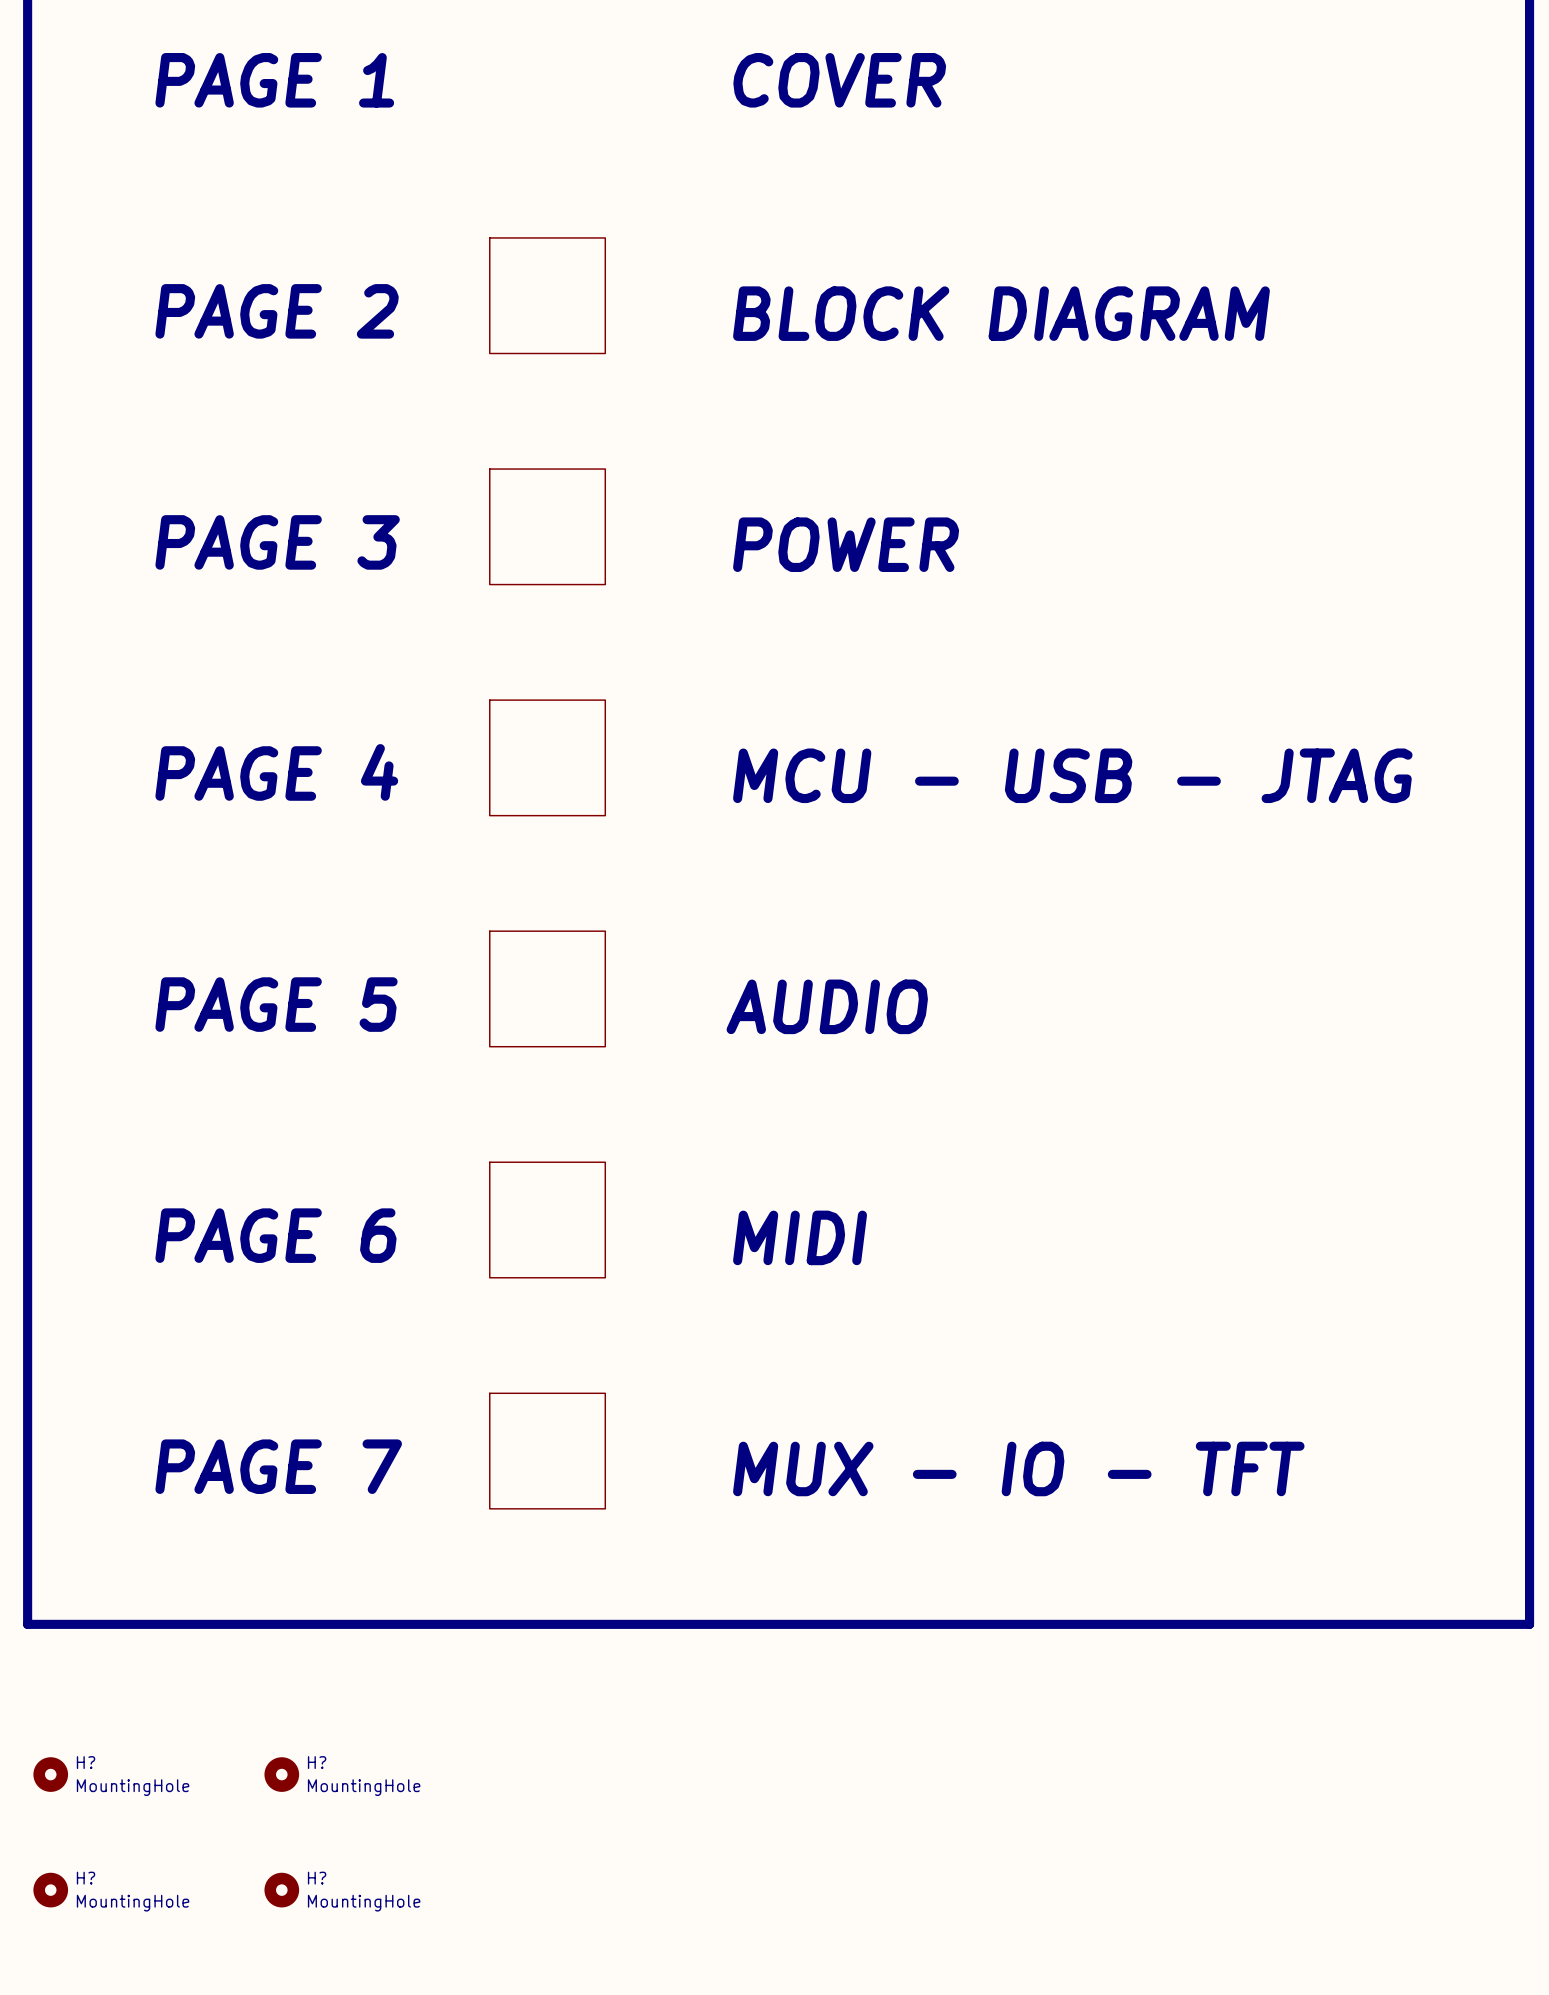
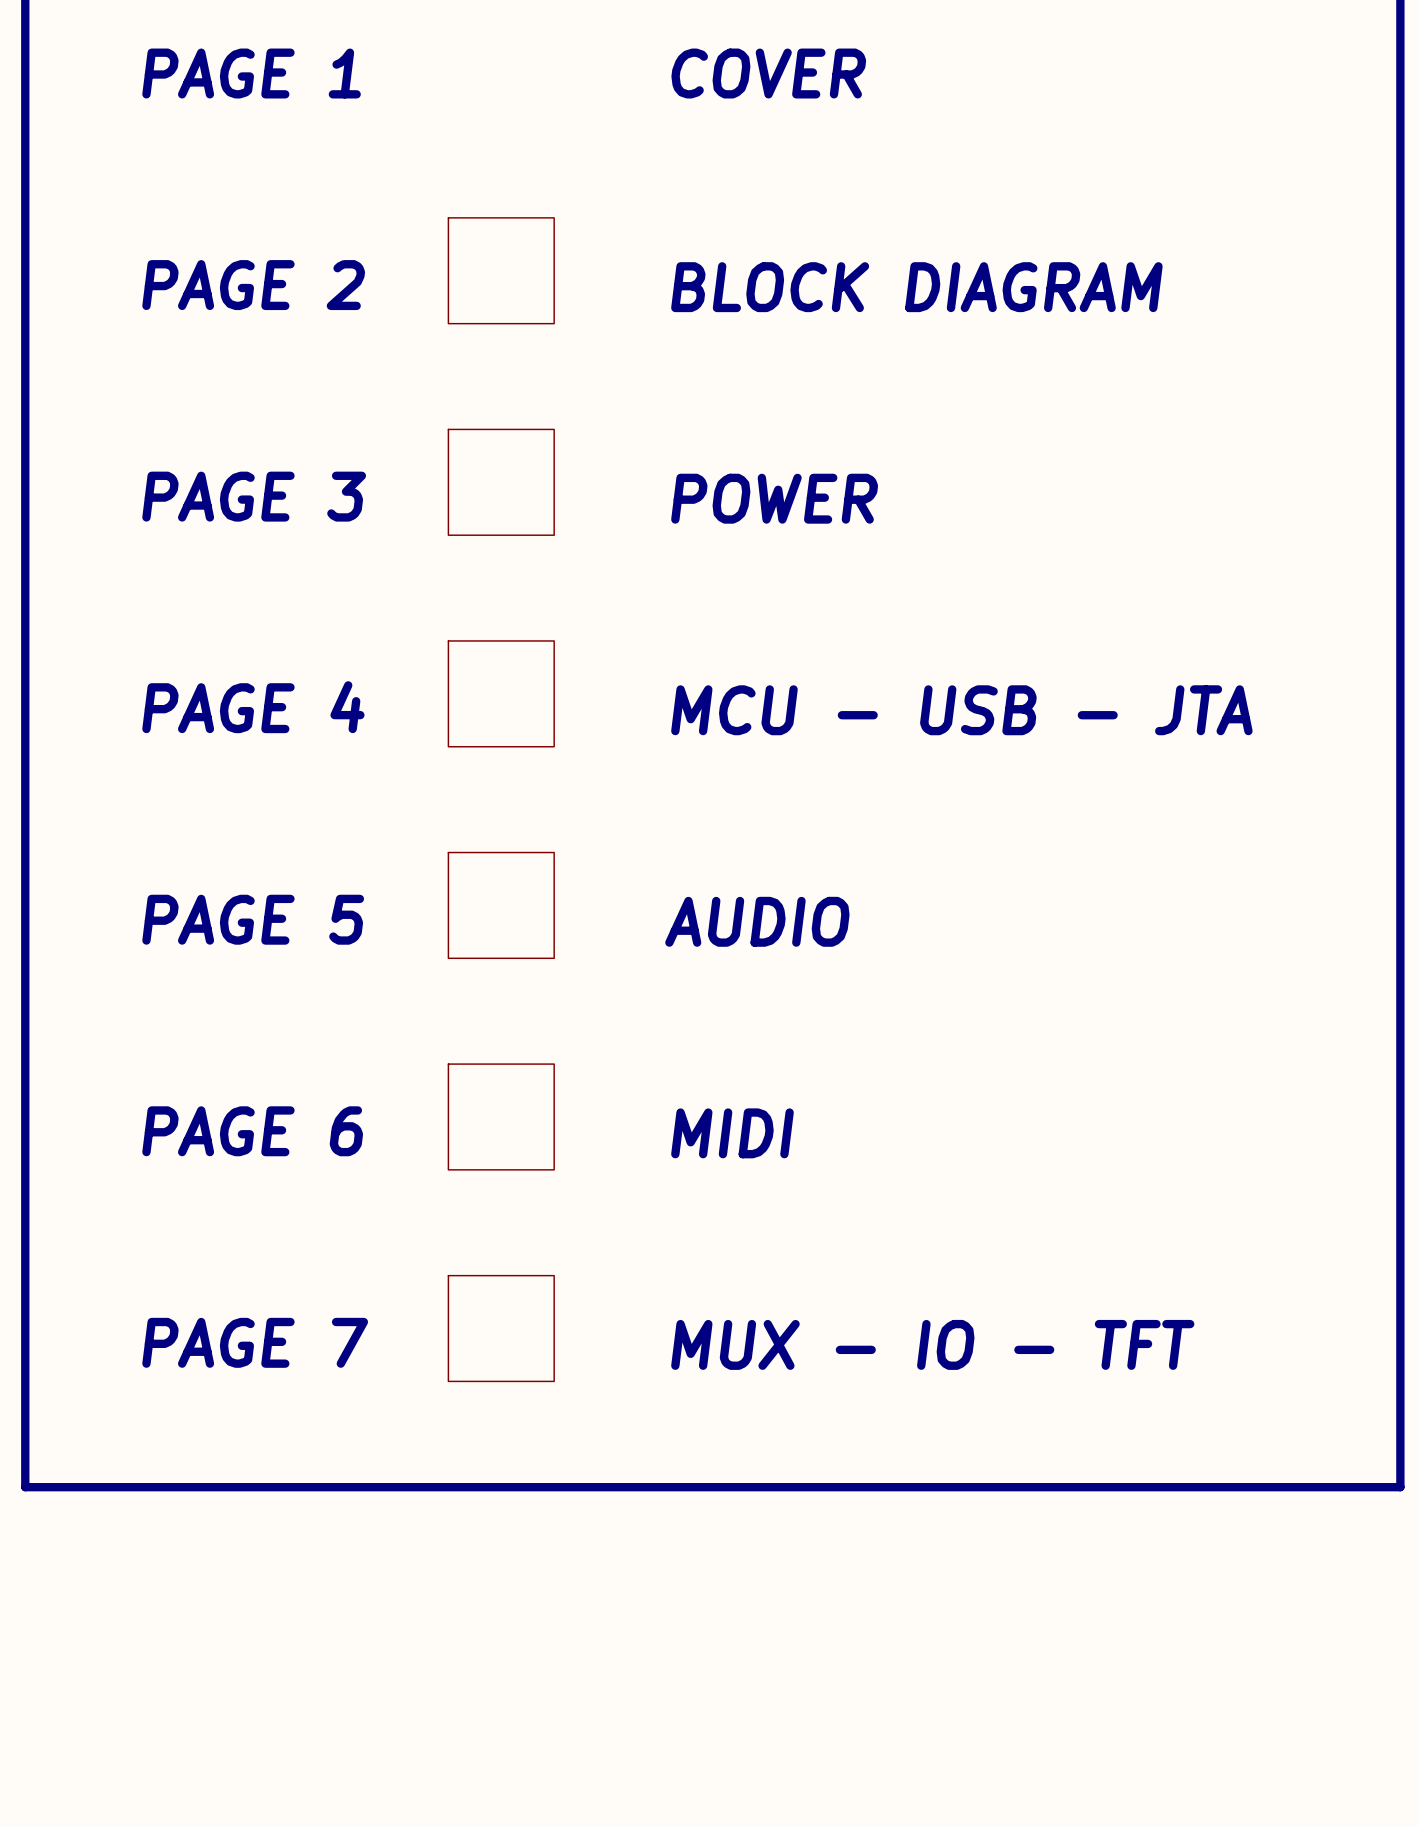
sheet MCU - USB - JTAG name: MCU - USB - JTAG (1072, 775) -> MCU - USB - JTA (961, 710)
H?: MountingHole (50, 1774) -> none
H?: MountingHole (281, 1774) -> none
H?: MountingHole (50, 1890) -> none
H?: MountingHole (281, 1890) -> none

